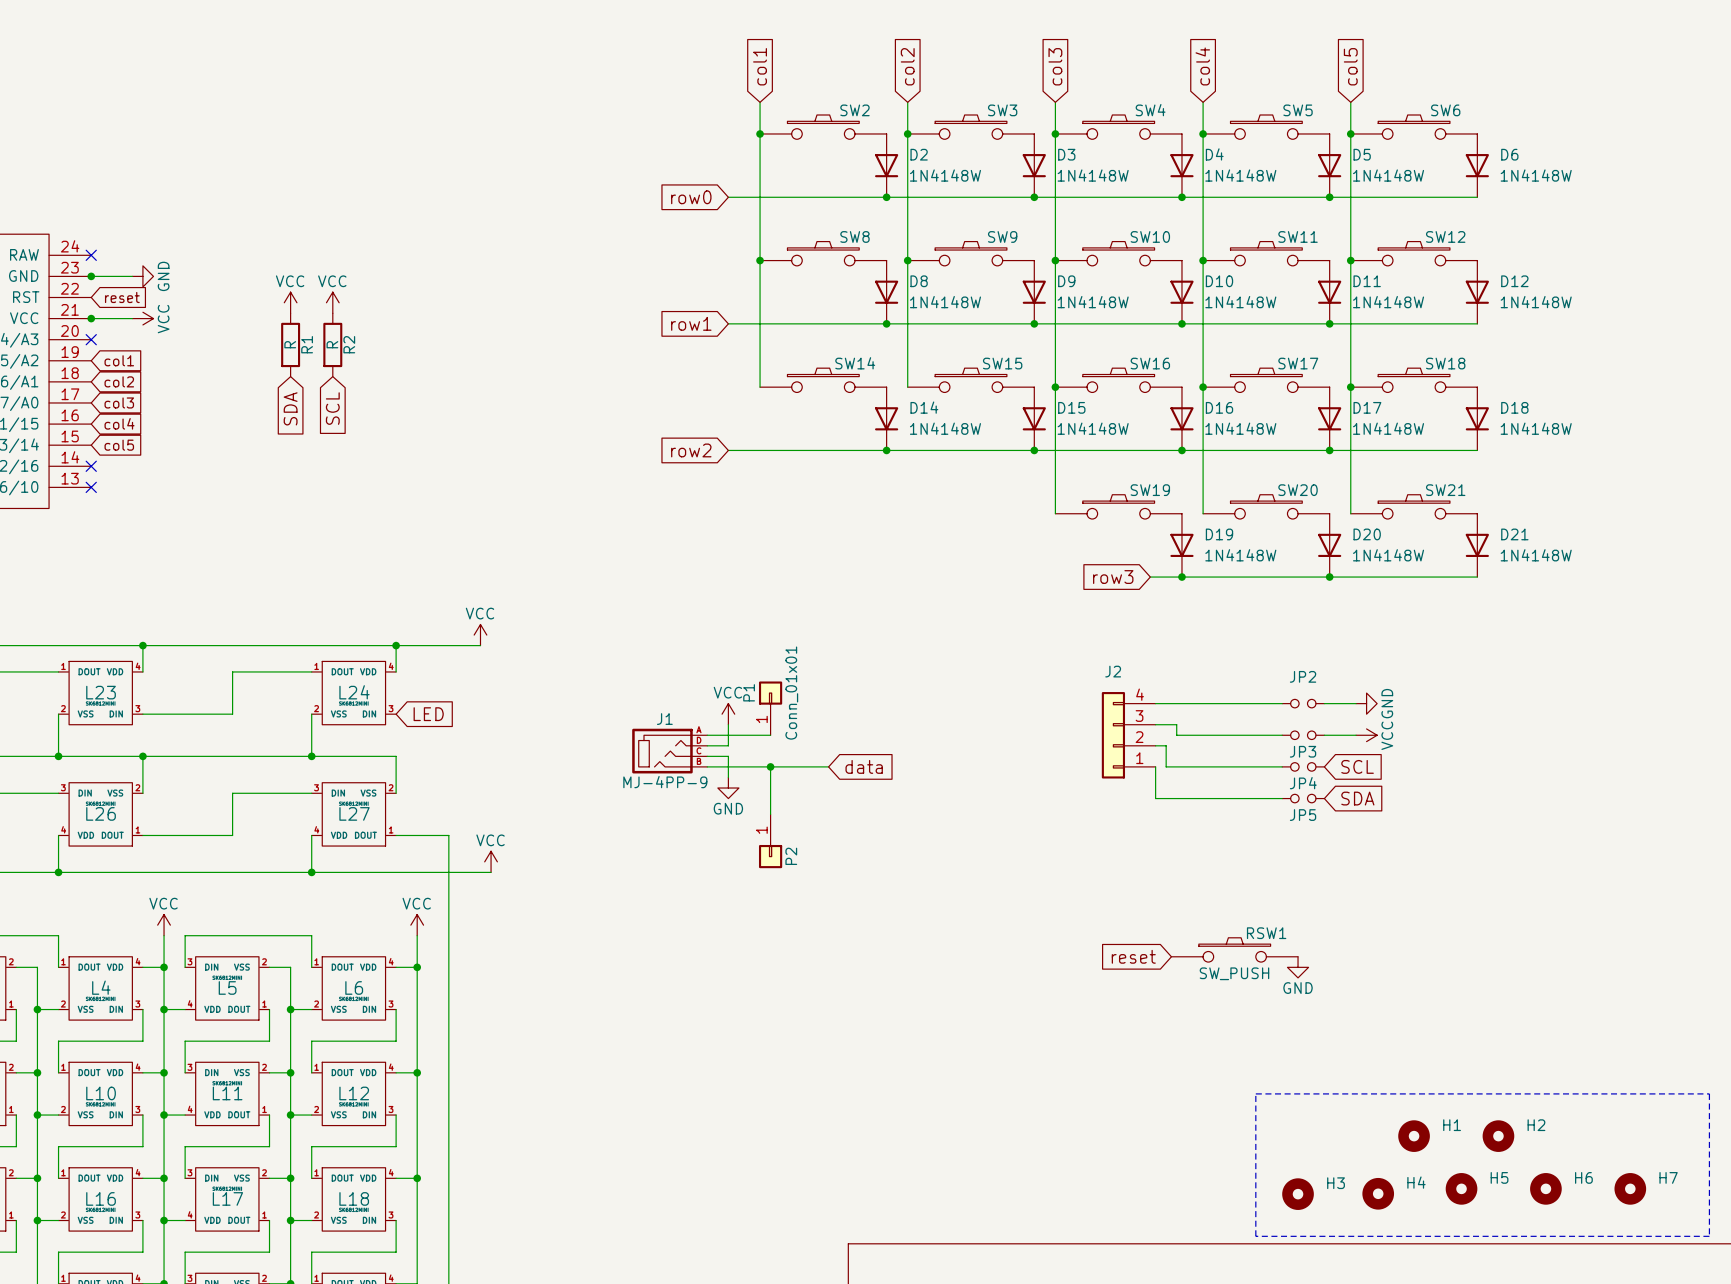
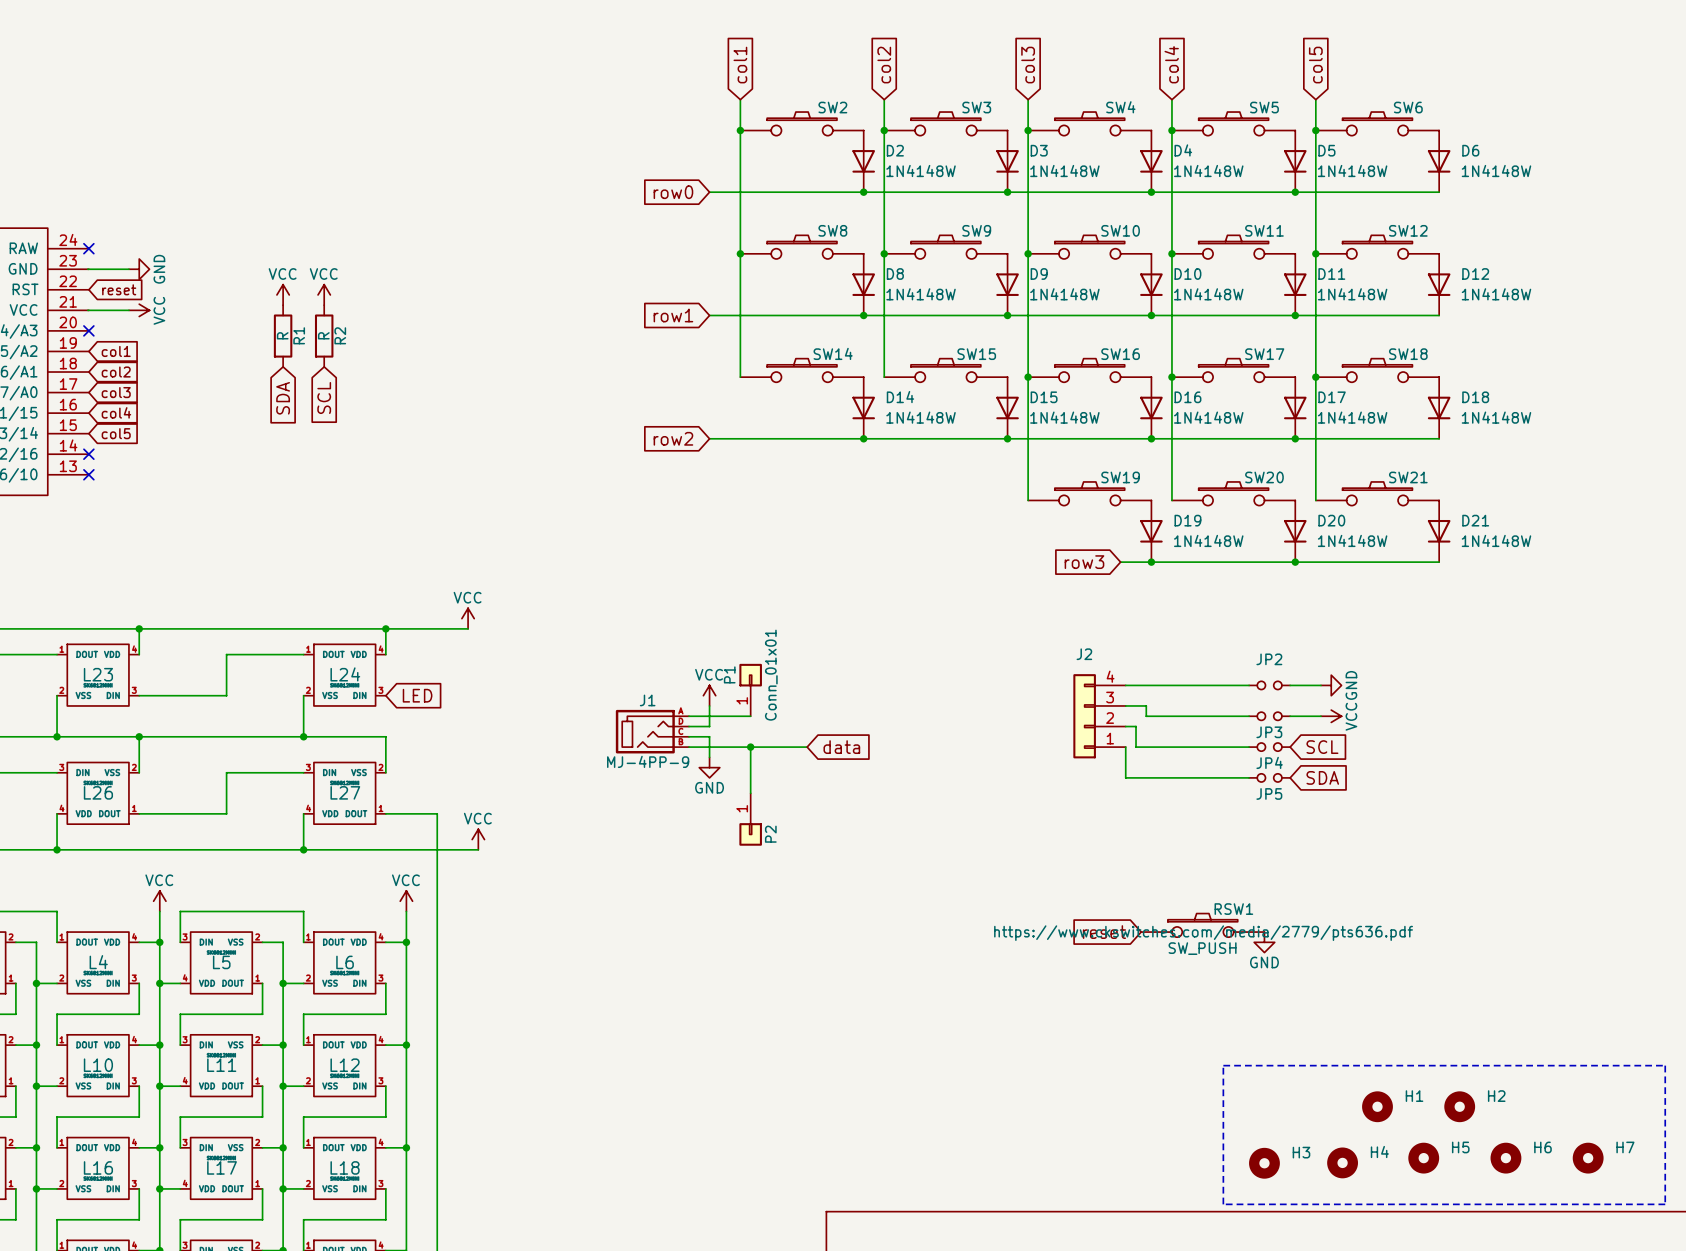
junction: (91, 276) -> none
junction: (91, 318) -> none
RSW1 text: none -> https://www.ckswitches.com/media/2779/pts636.pdf (1203, 933)

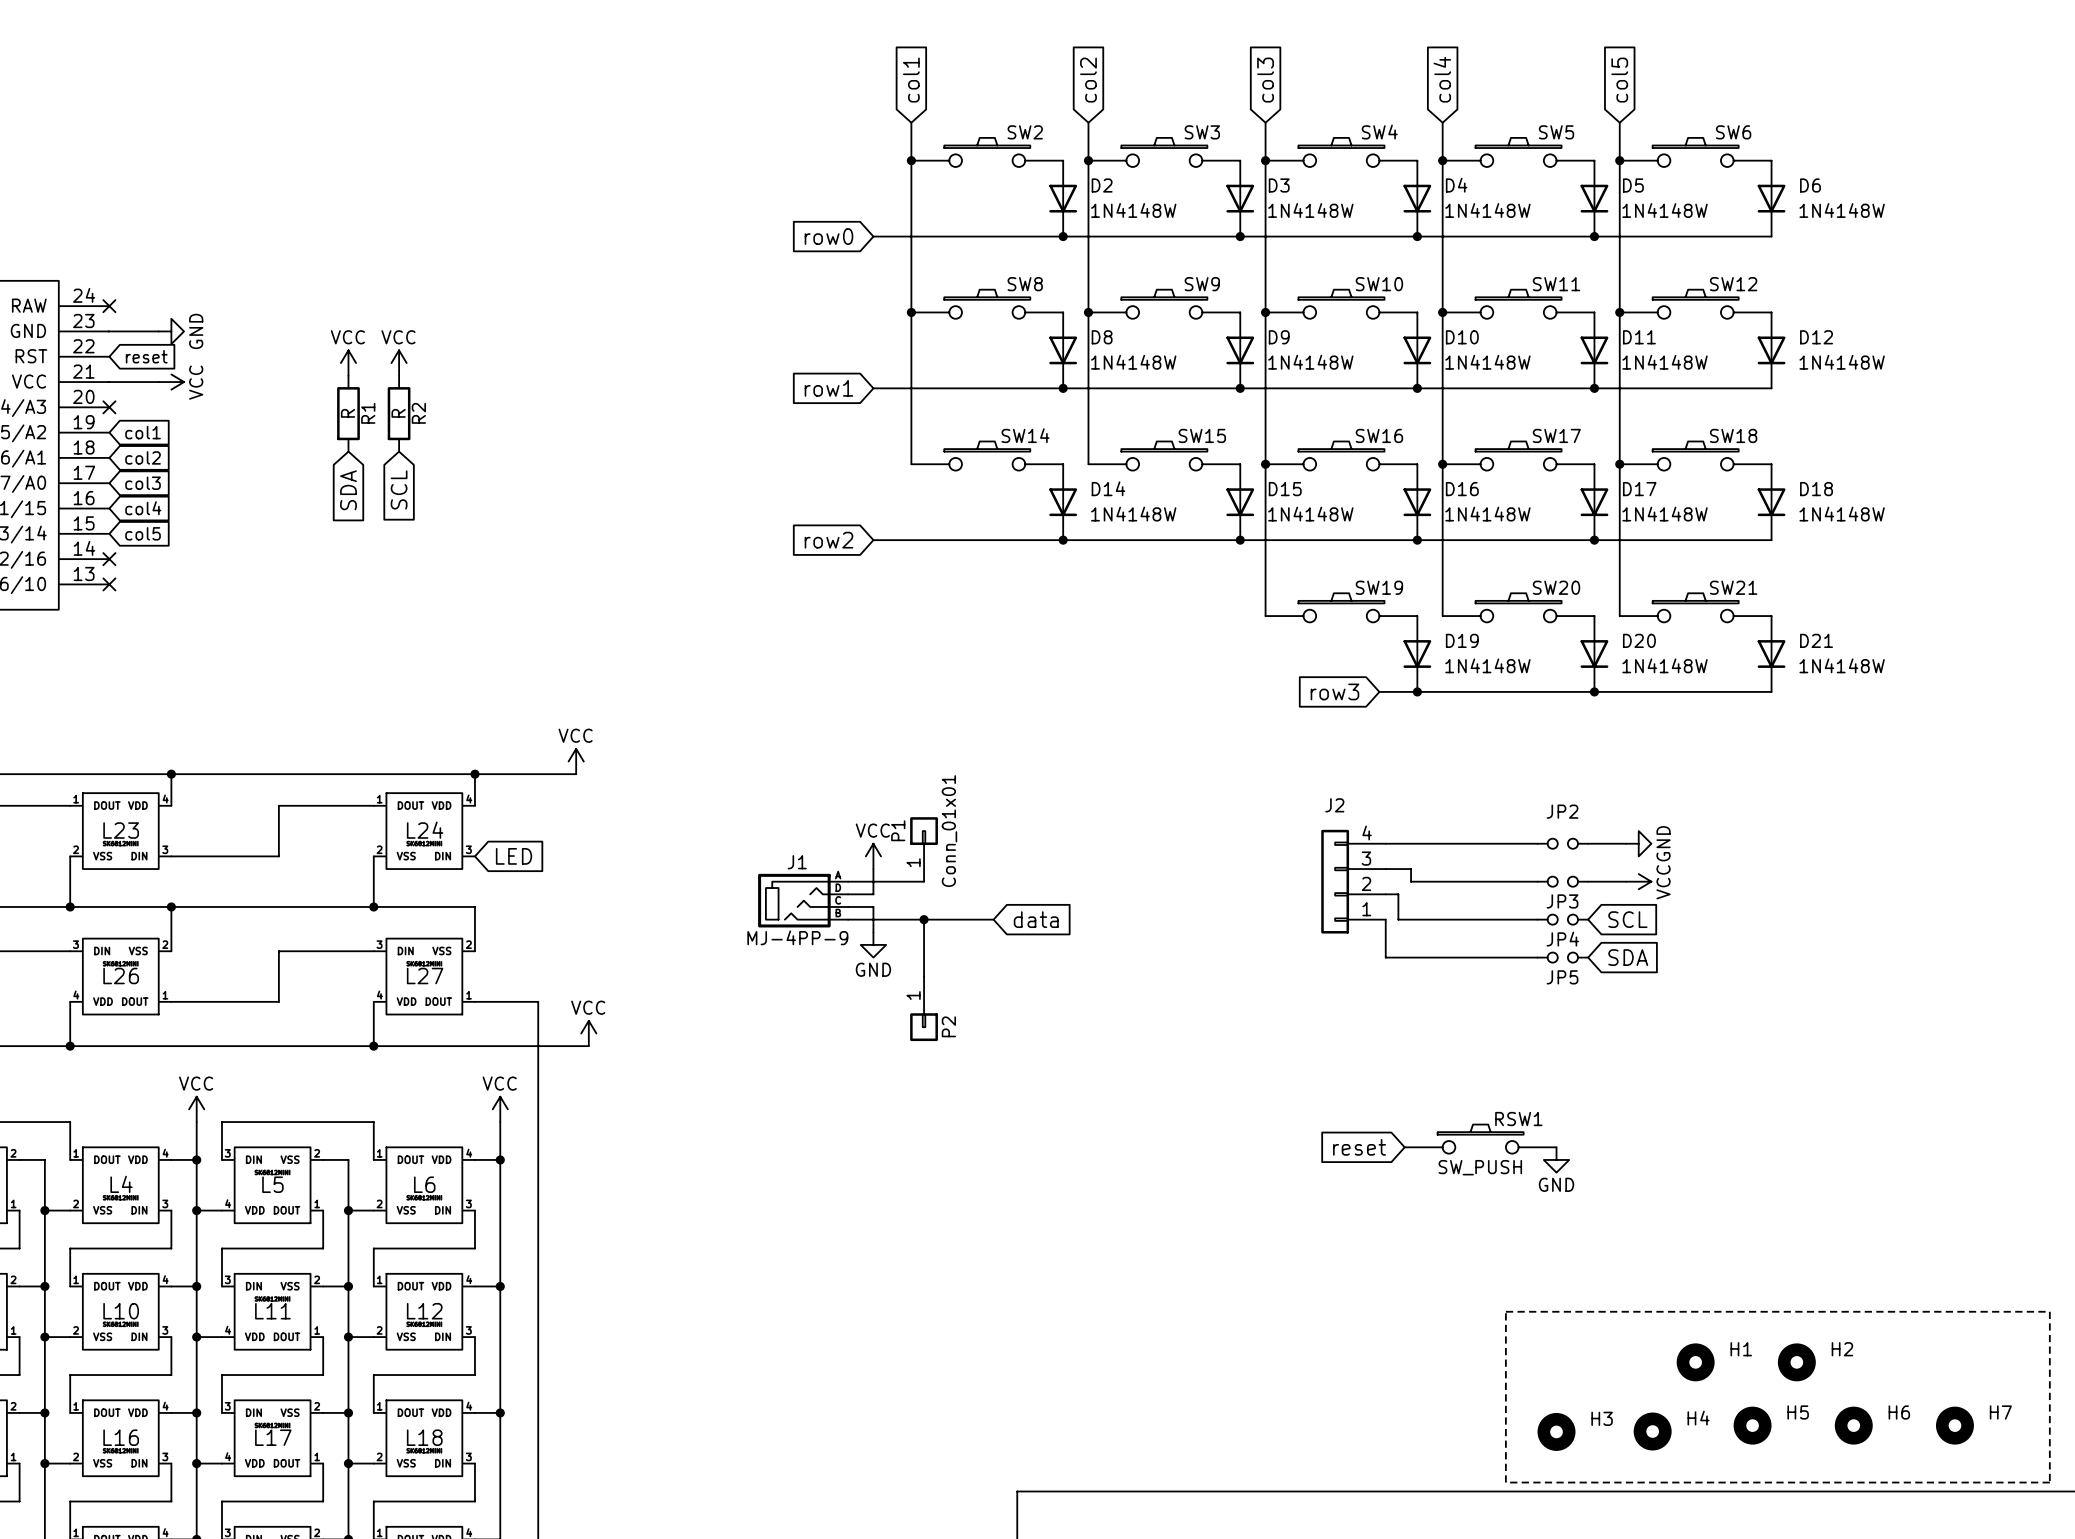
RSW1 text: https://www.ckswitches.com/media/2779/pts636.pdf (1203, 933) -> none

